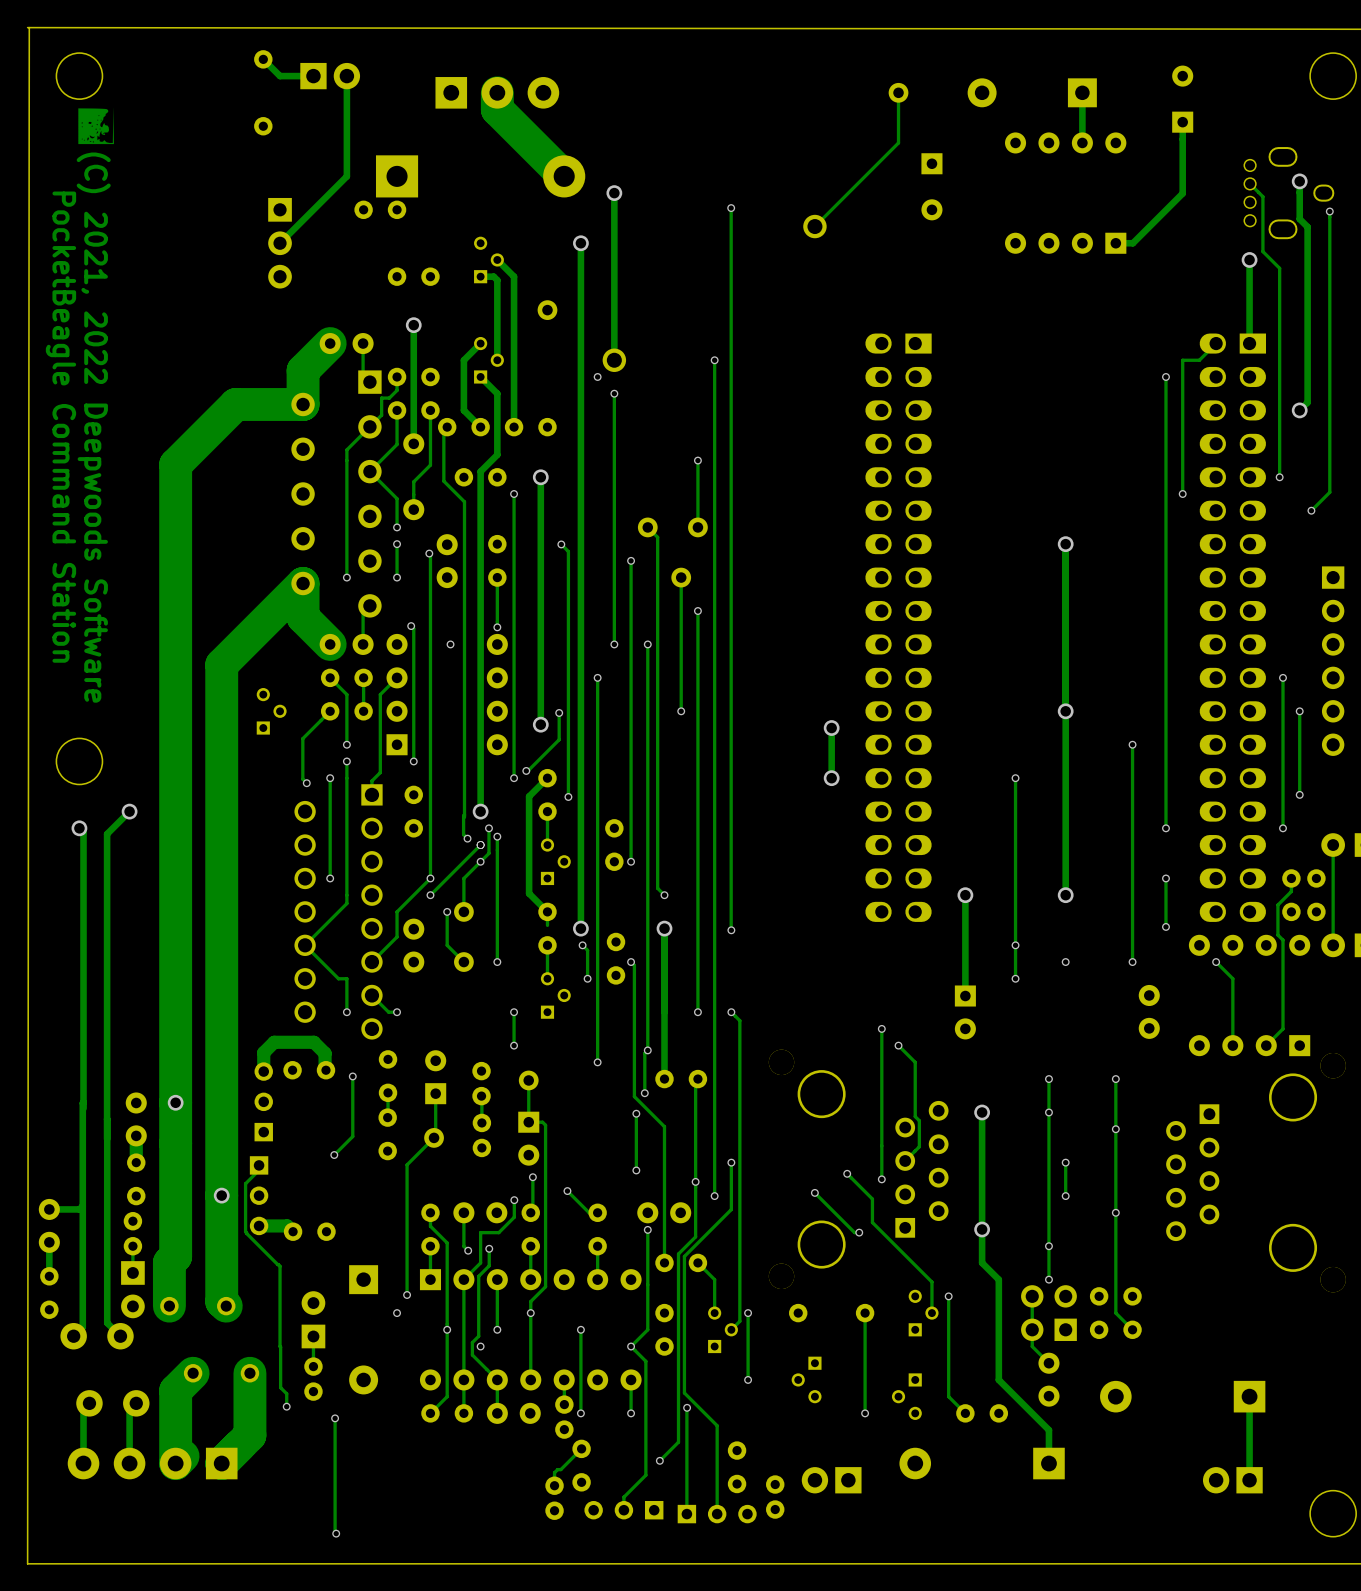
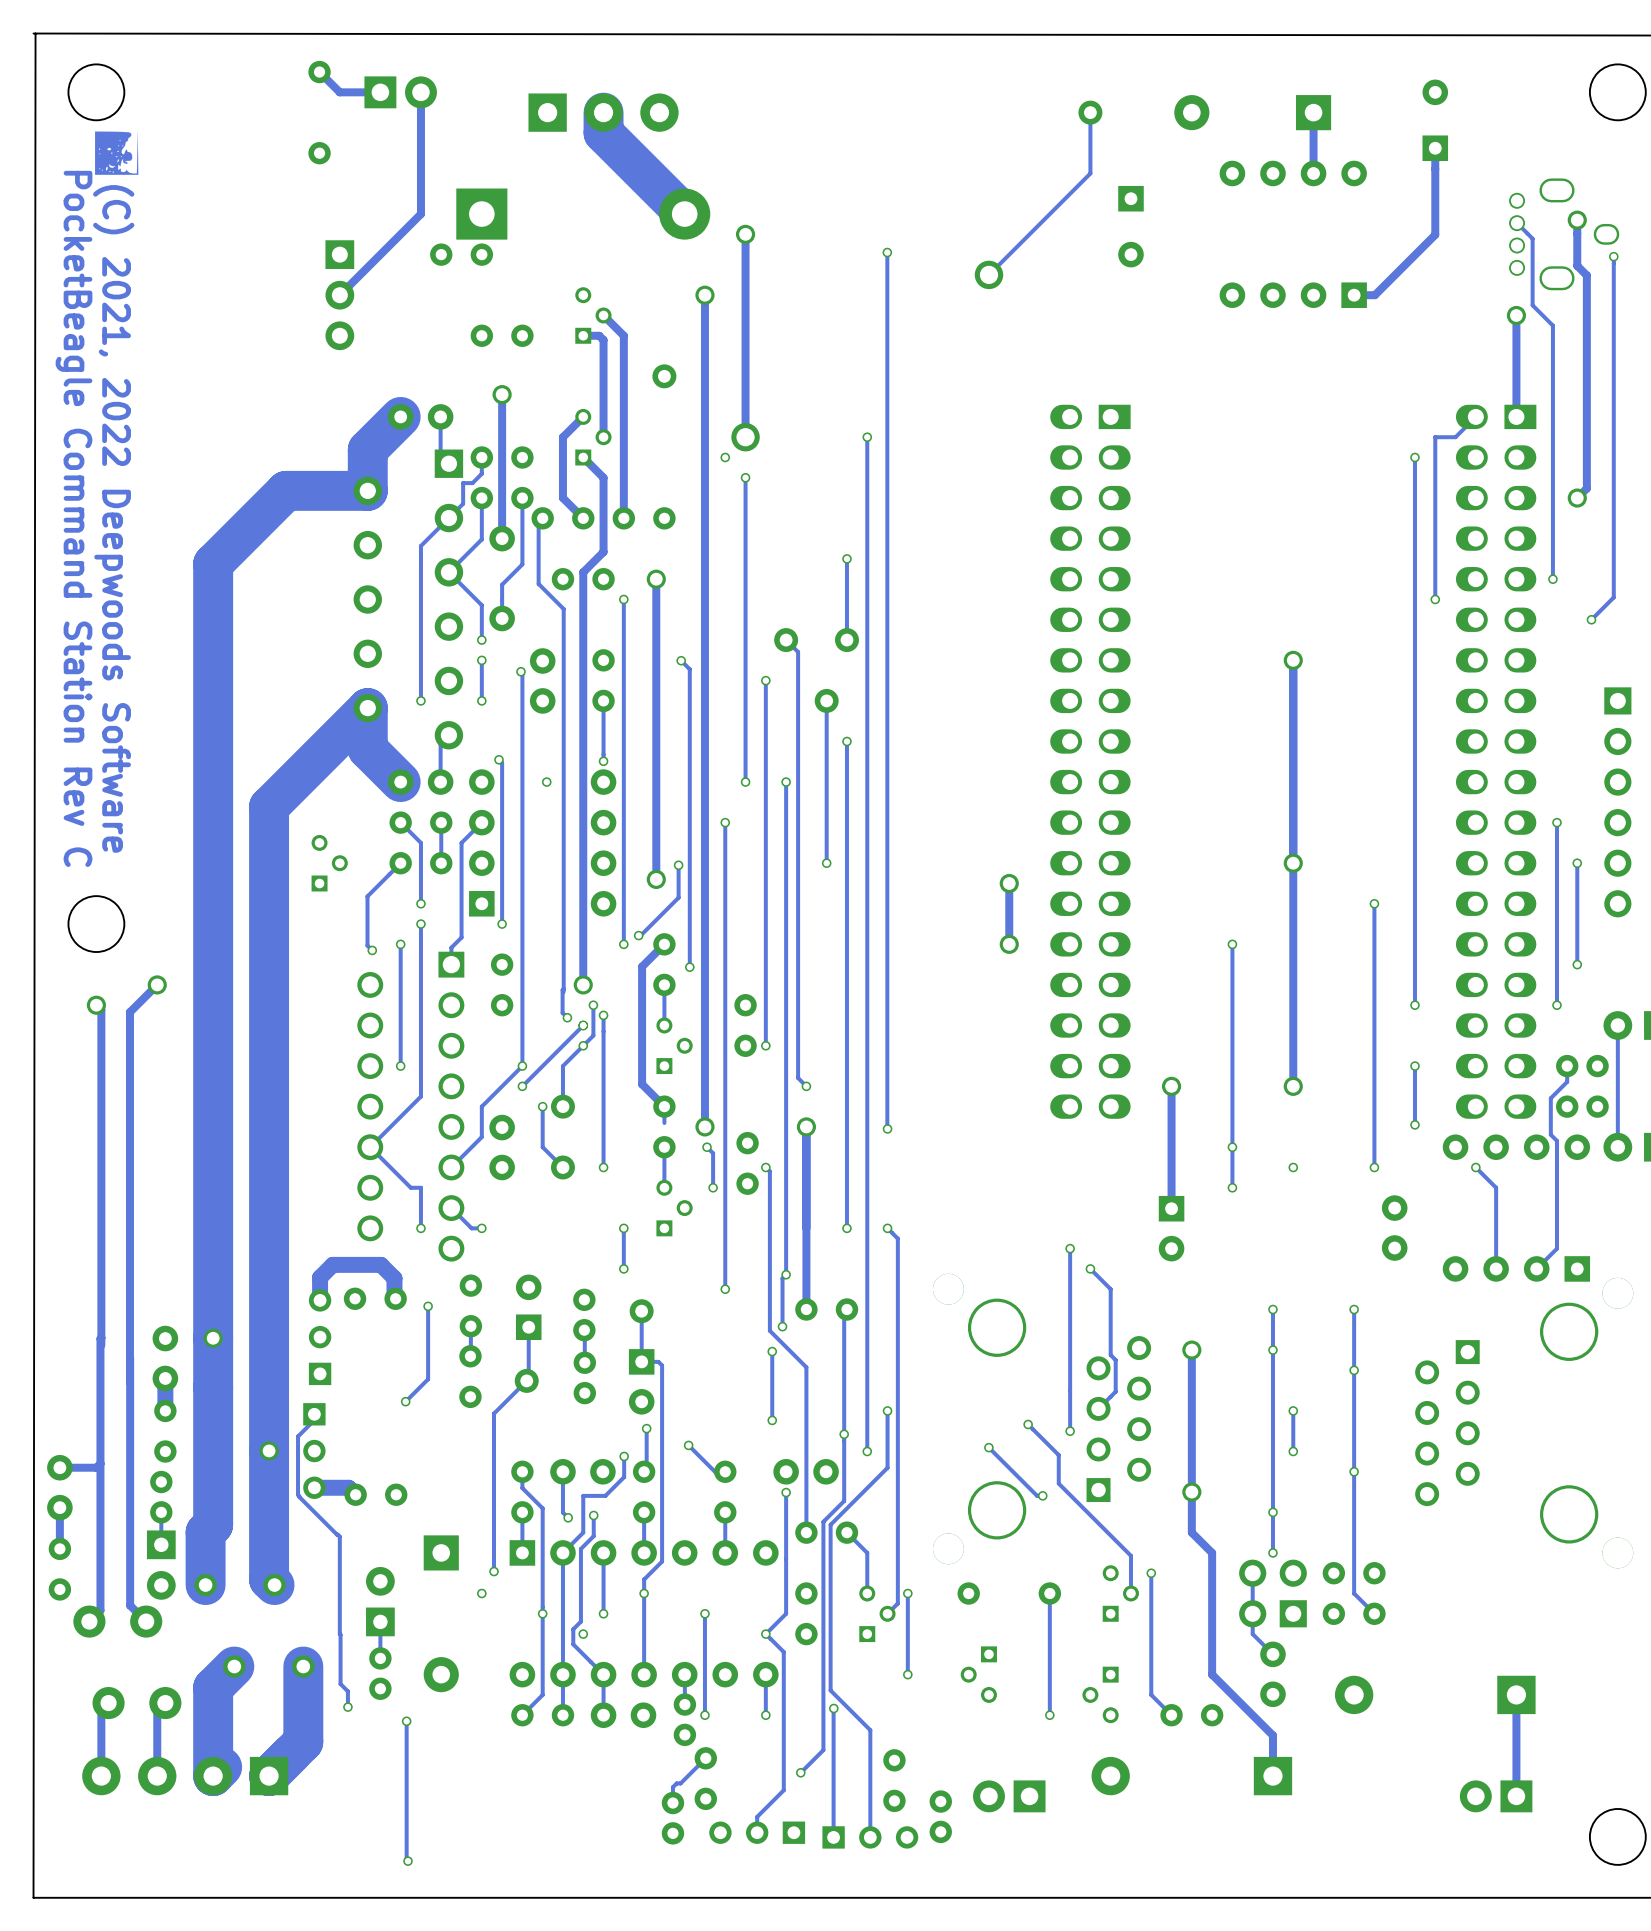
text: PocketBeagle Command Station (60, 427) -> PocketBeagle Command Station Rev C (74, 518)

